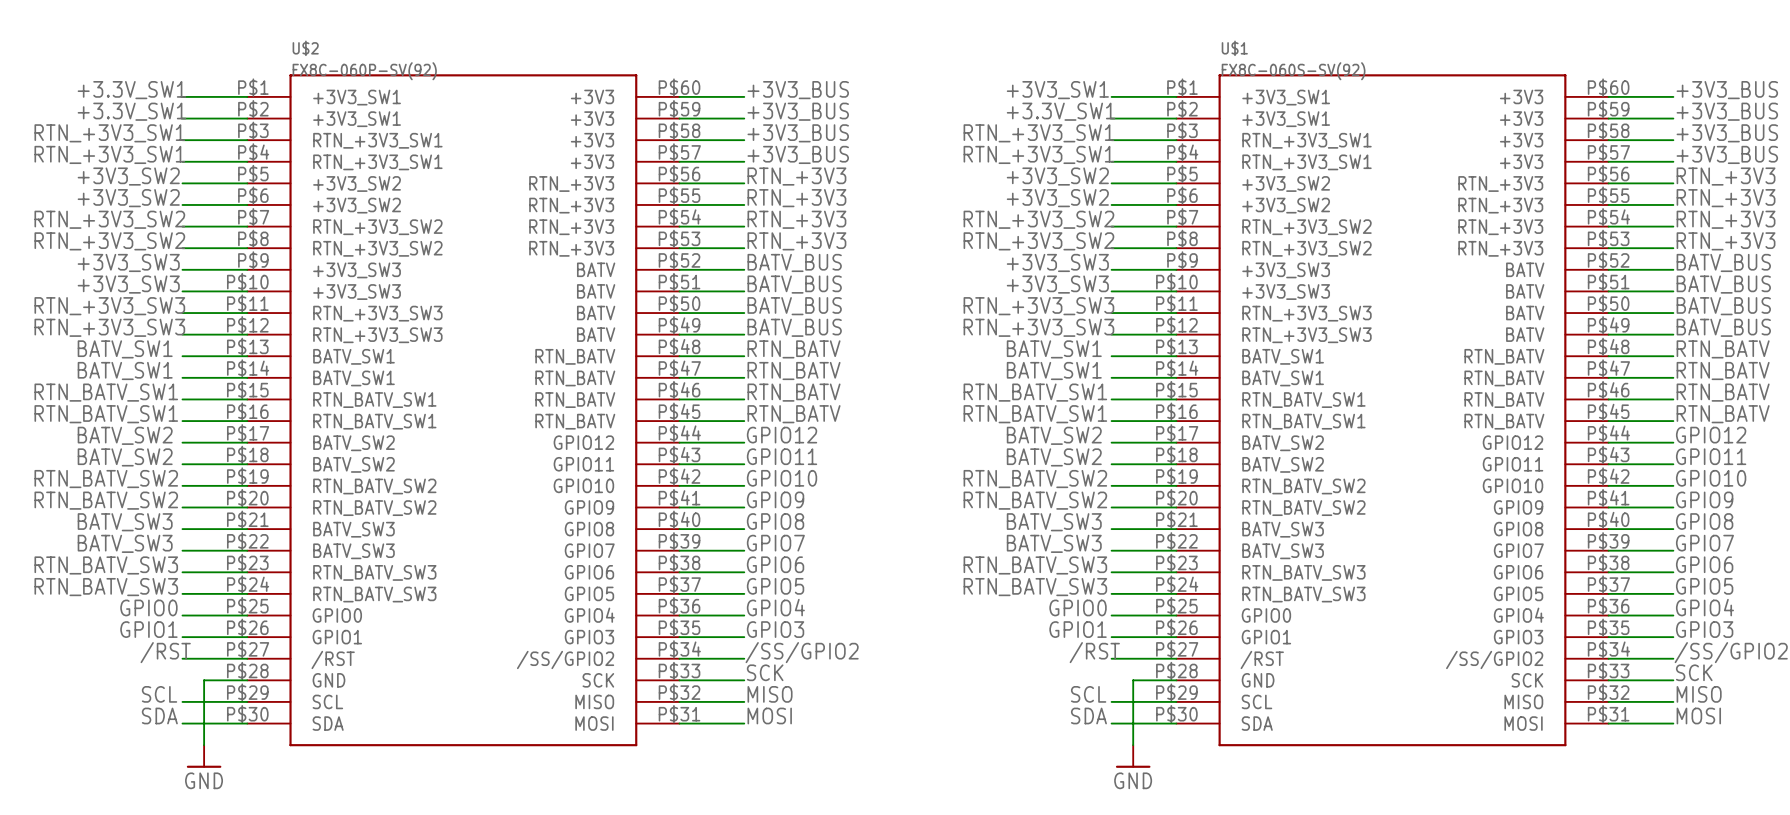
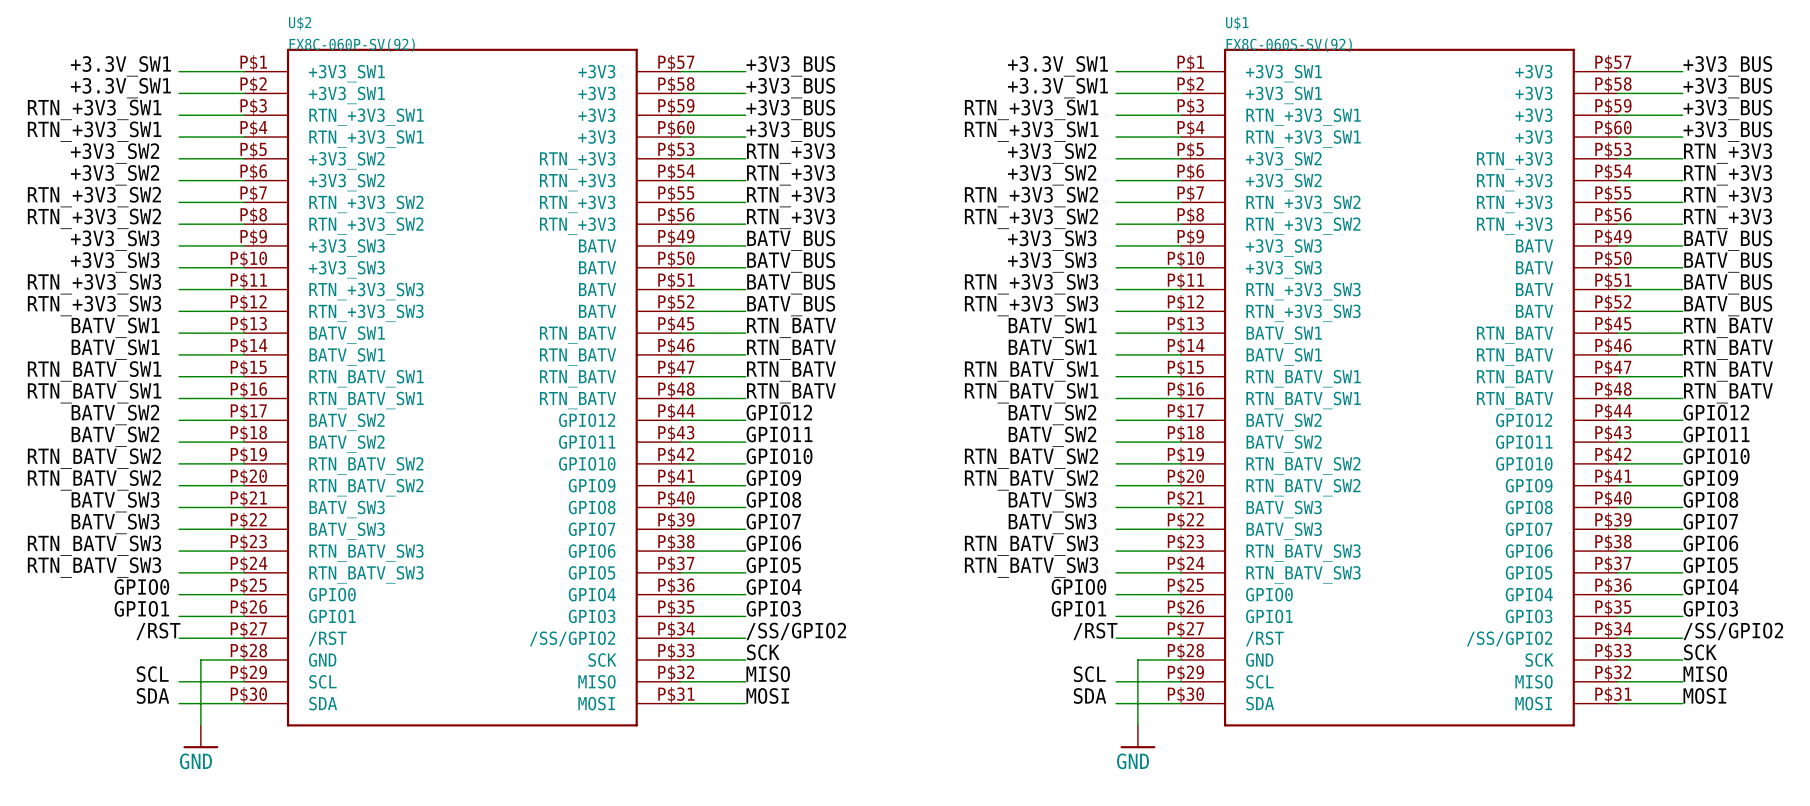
U$2 symbol: [247, 74, 680, 747] -> [244, 48, 681, 727]
U$1 symbol: [1176, 74, 1609, 747] -> [1181, 48, 1618, 727]
label: +3V3_SW1 (1057, 90) -> +3.3V_SW1 (1057, 66)

